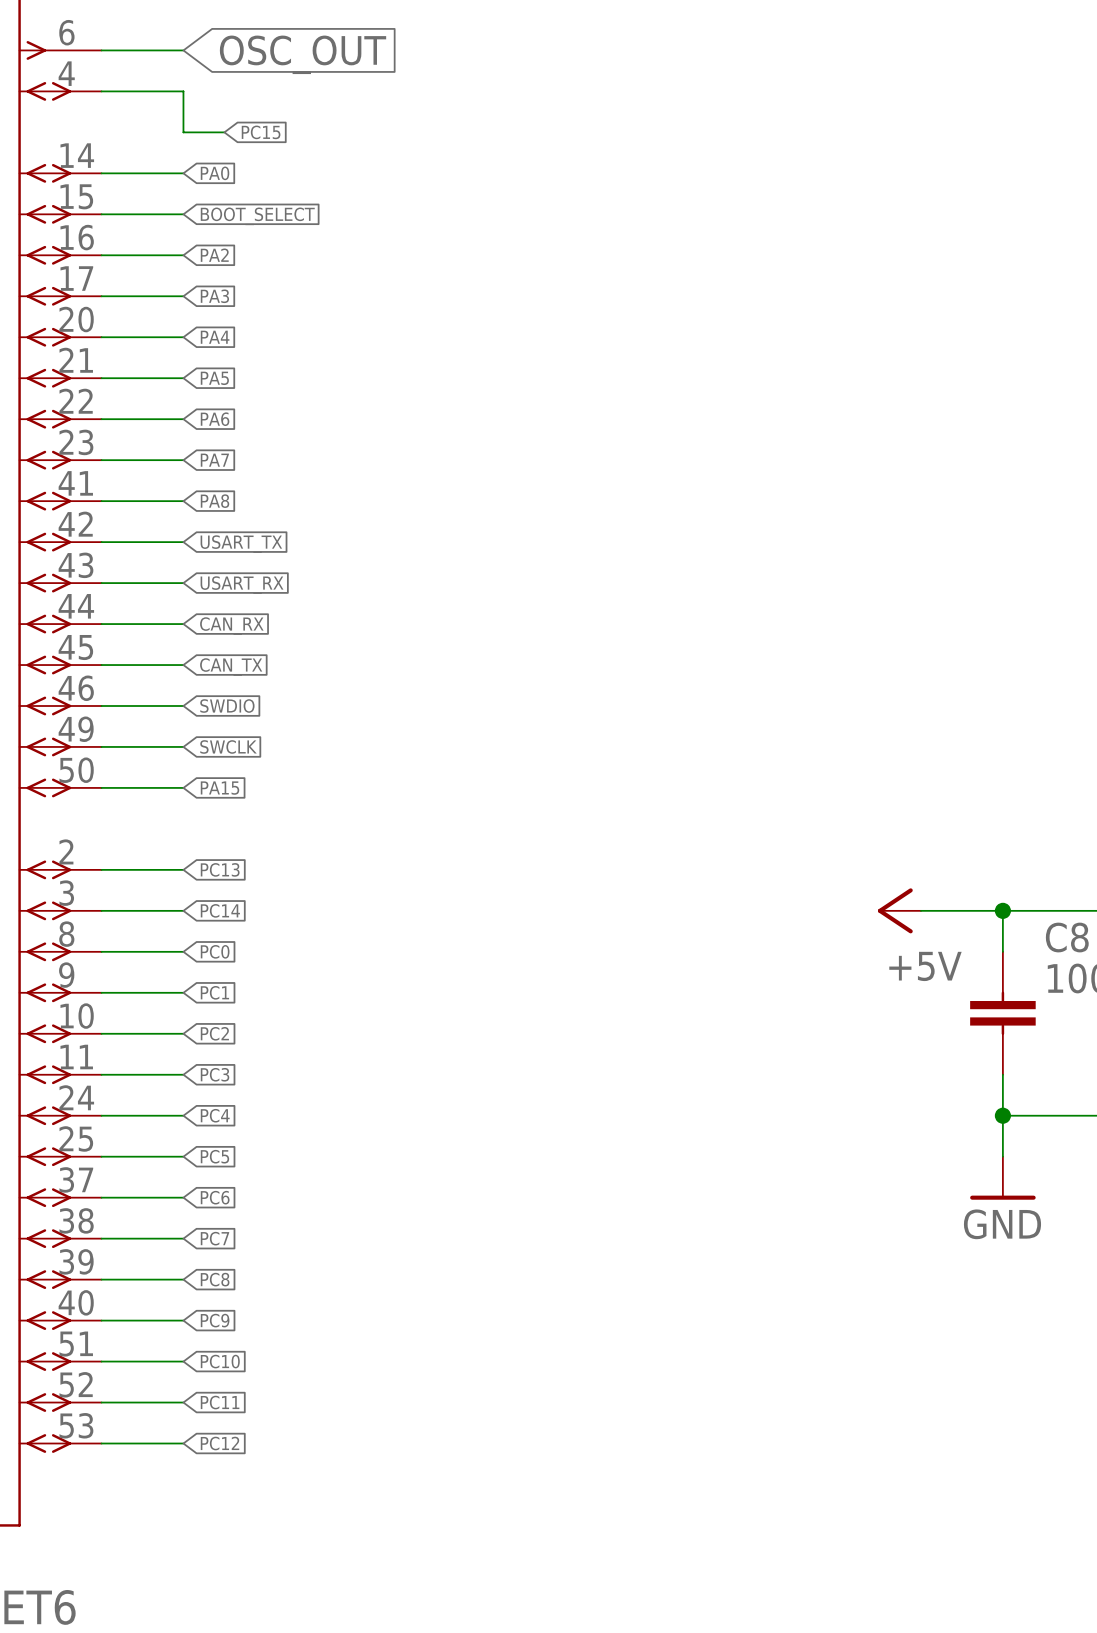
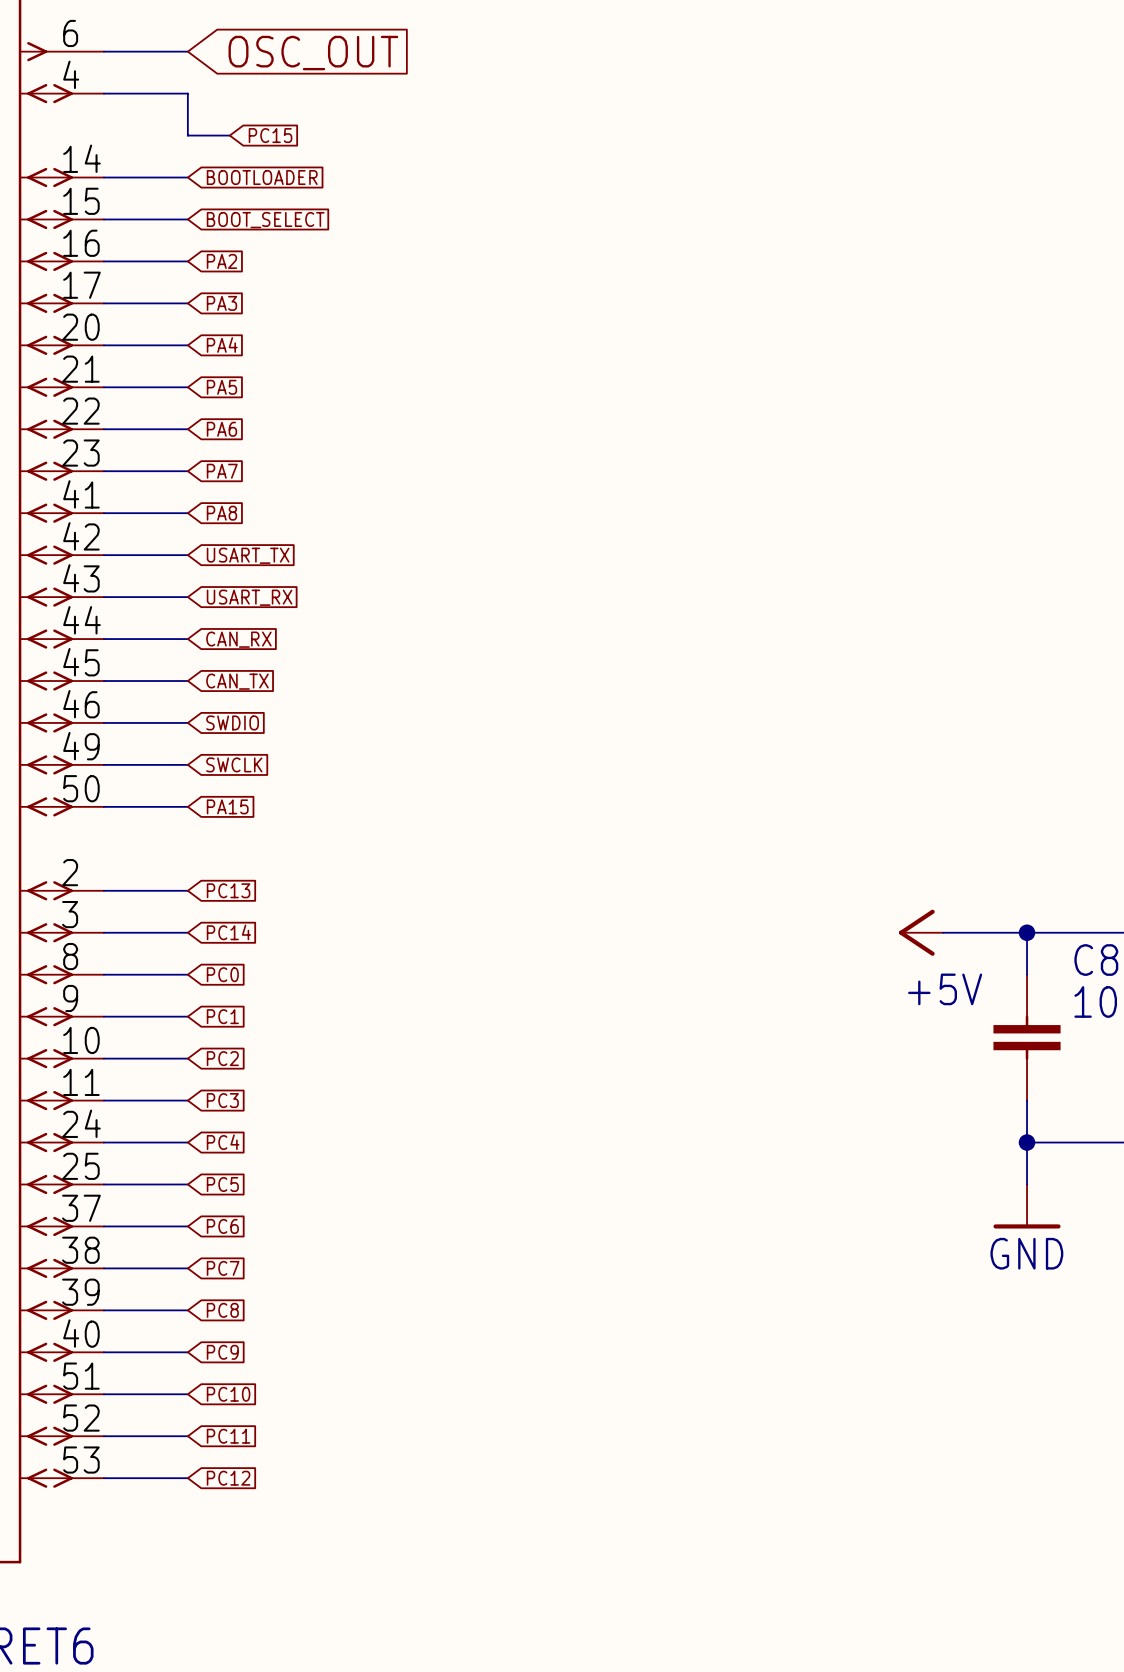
global label: PA0 (215, 173) -> BOOTLOADER (262, 177)

